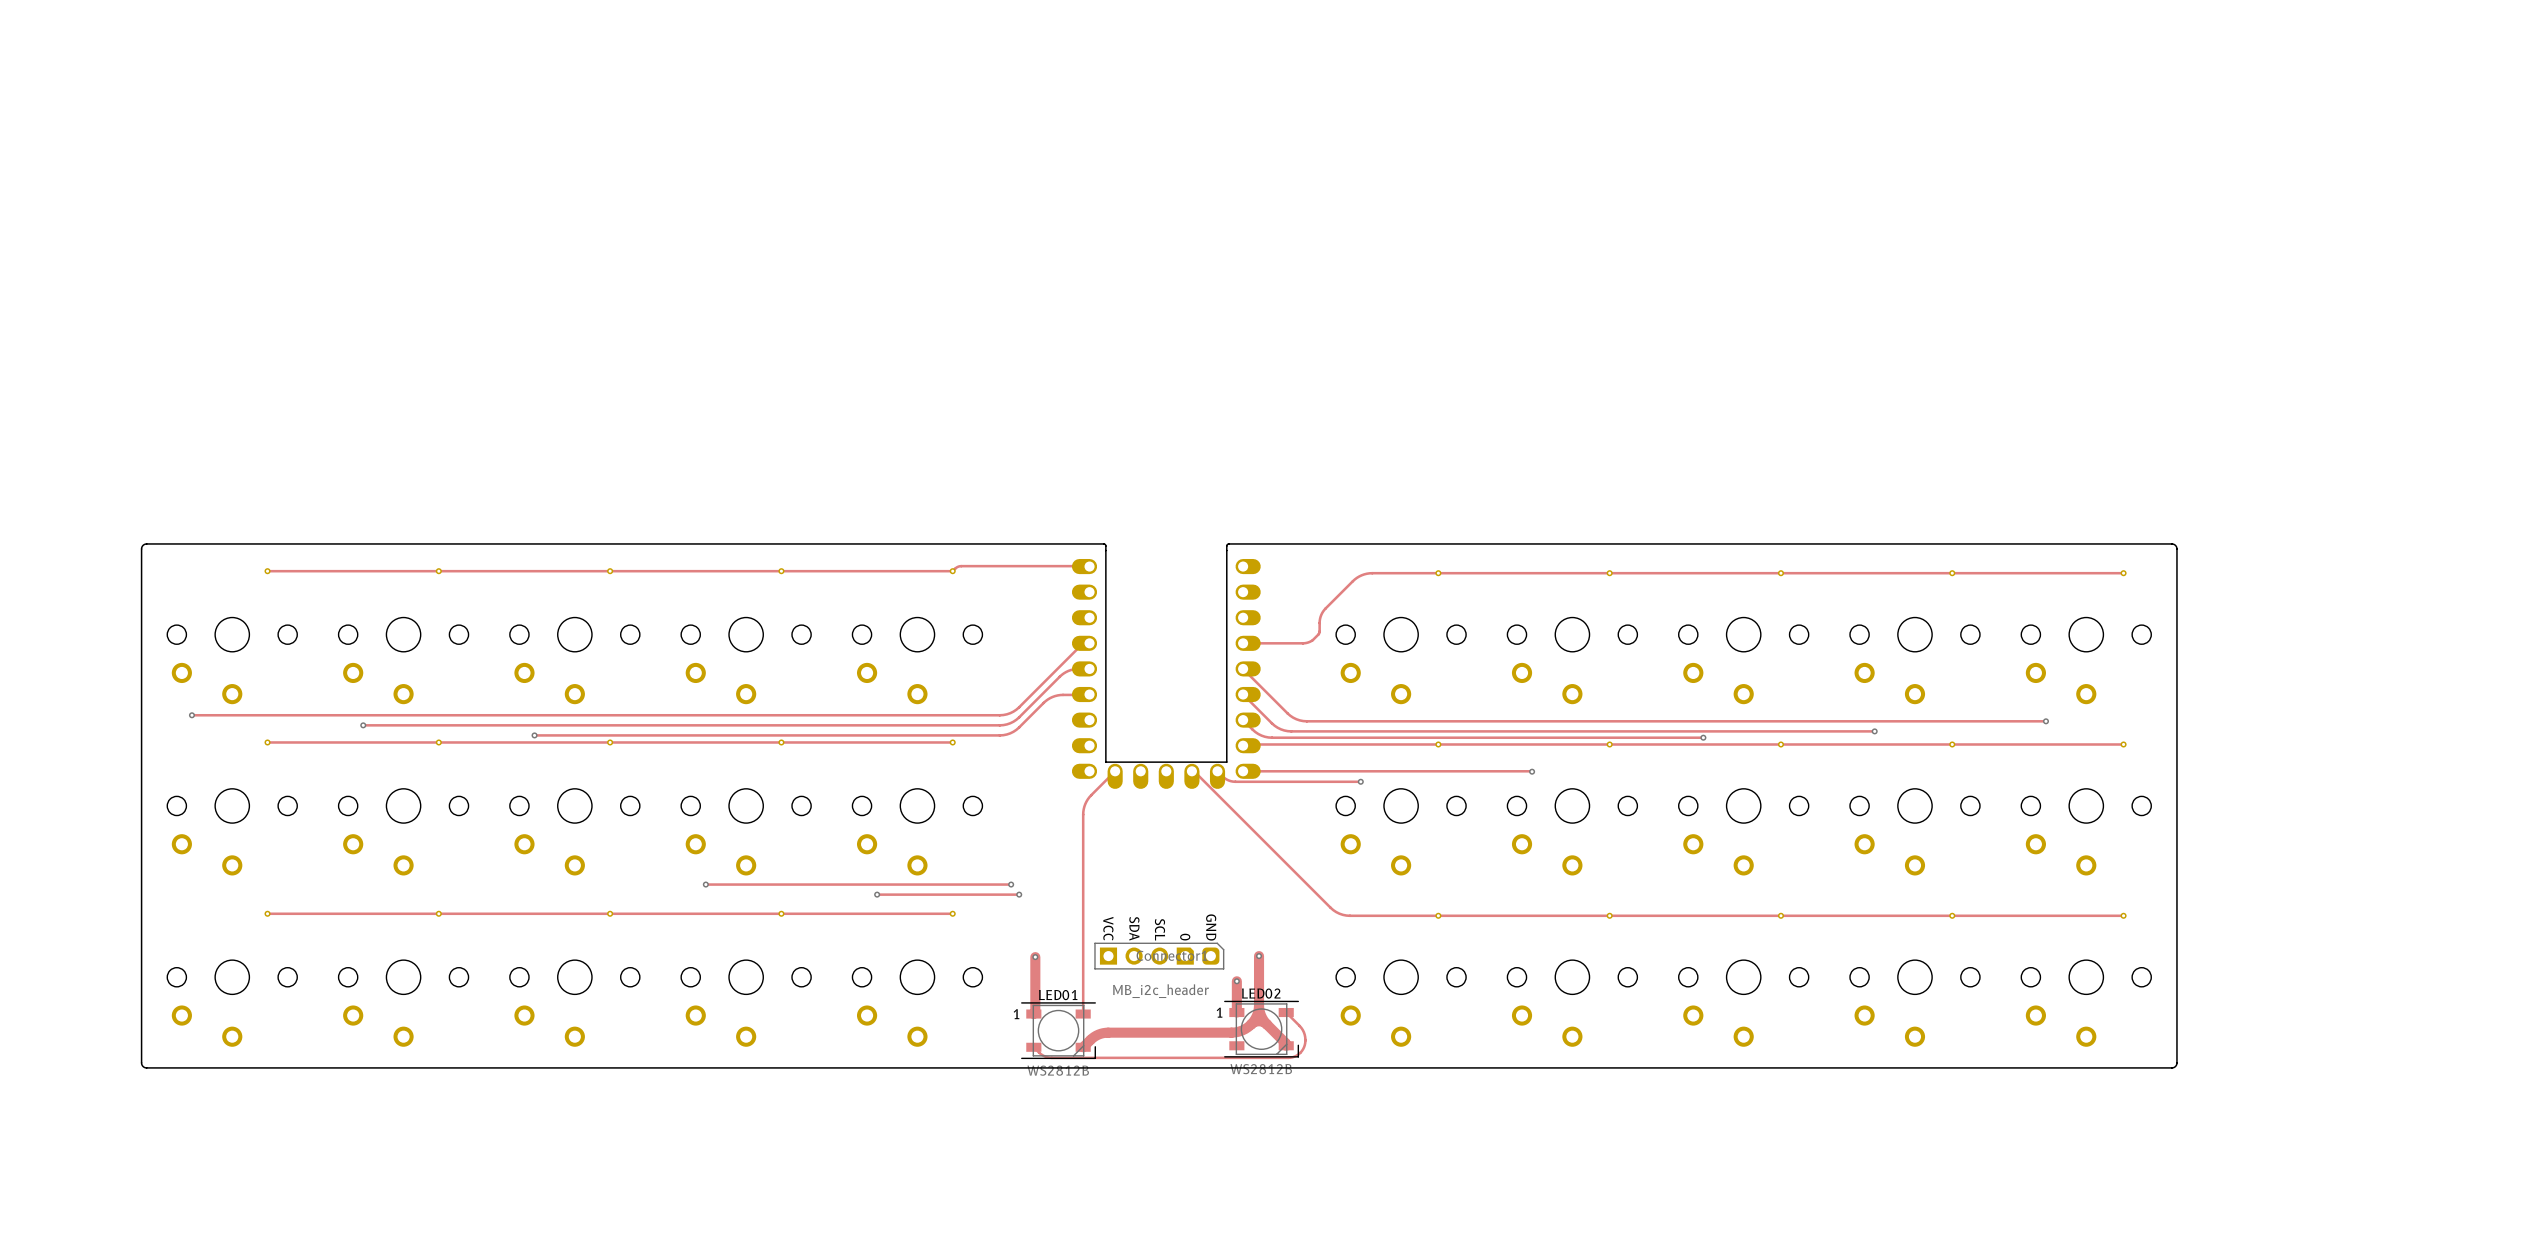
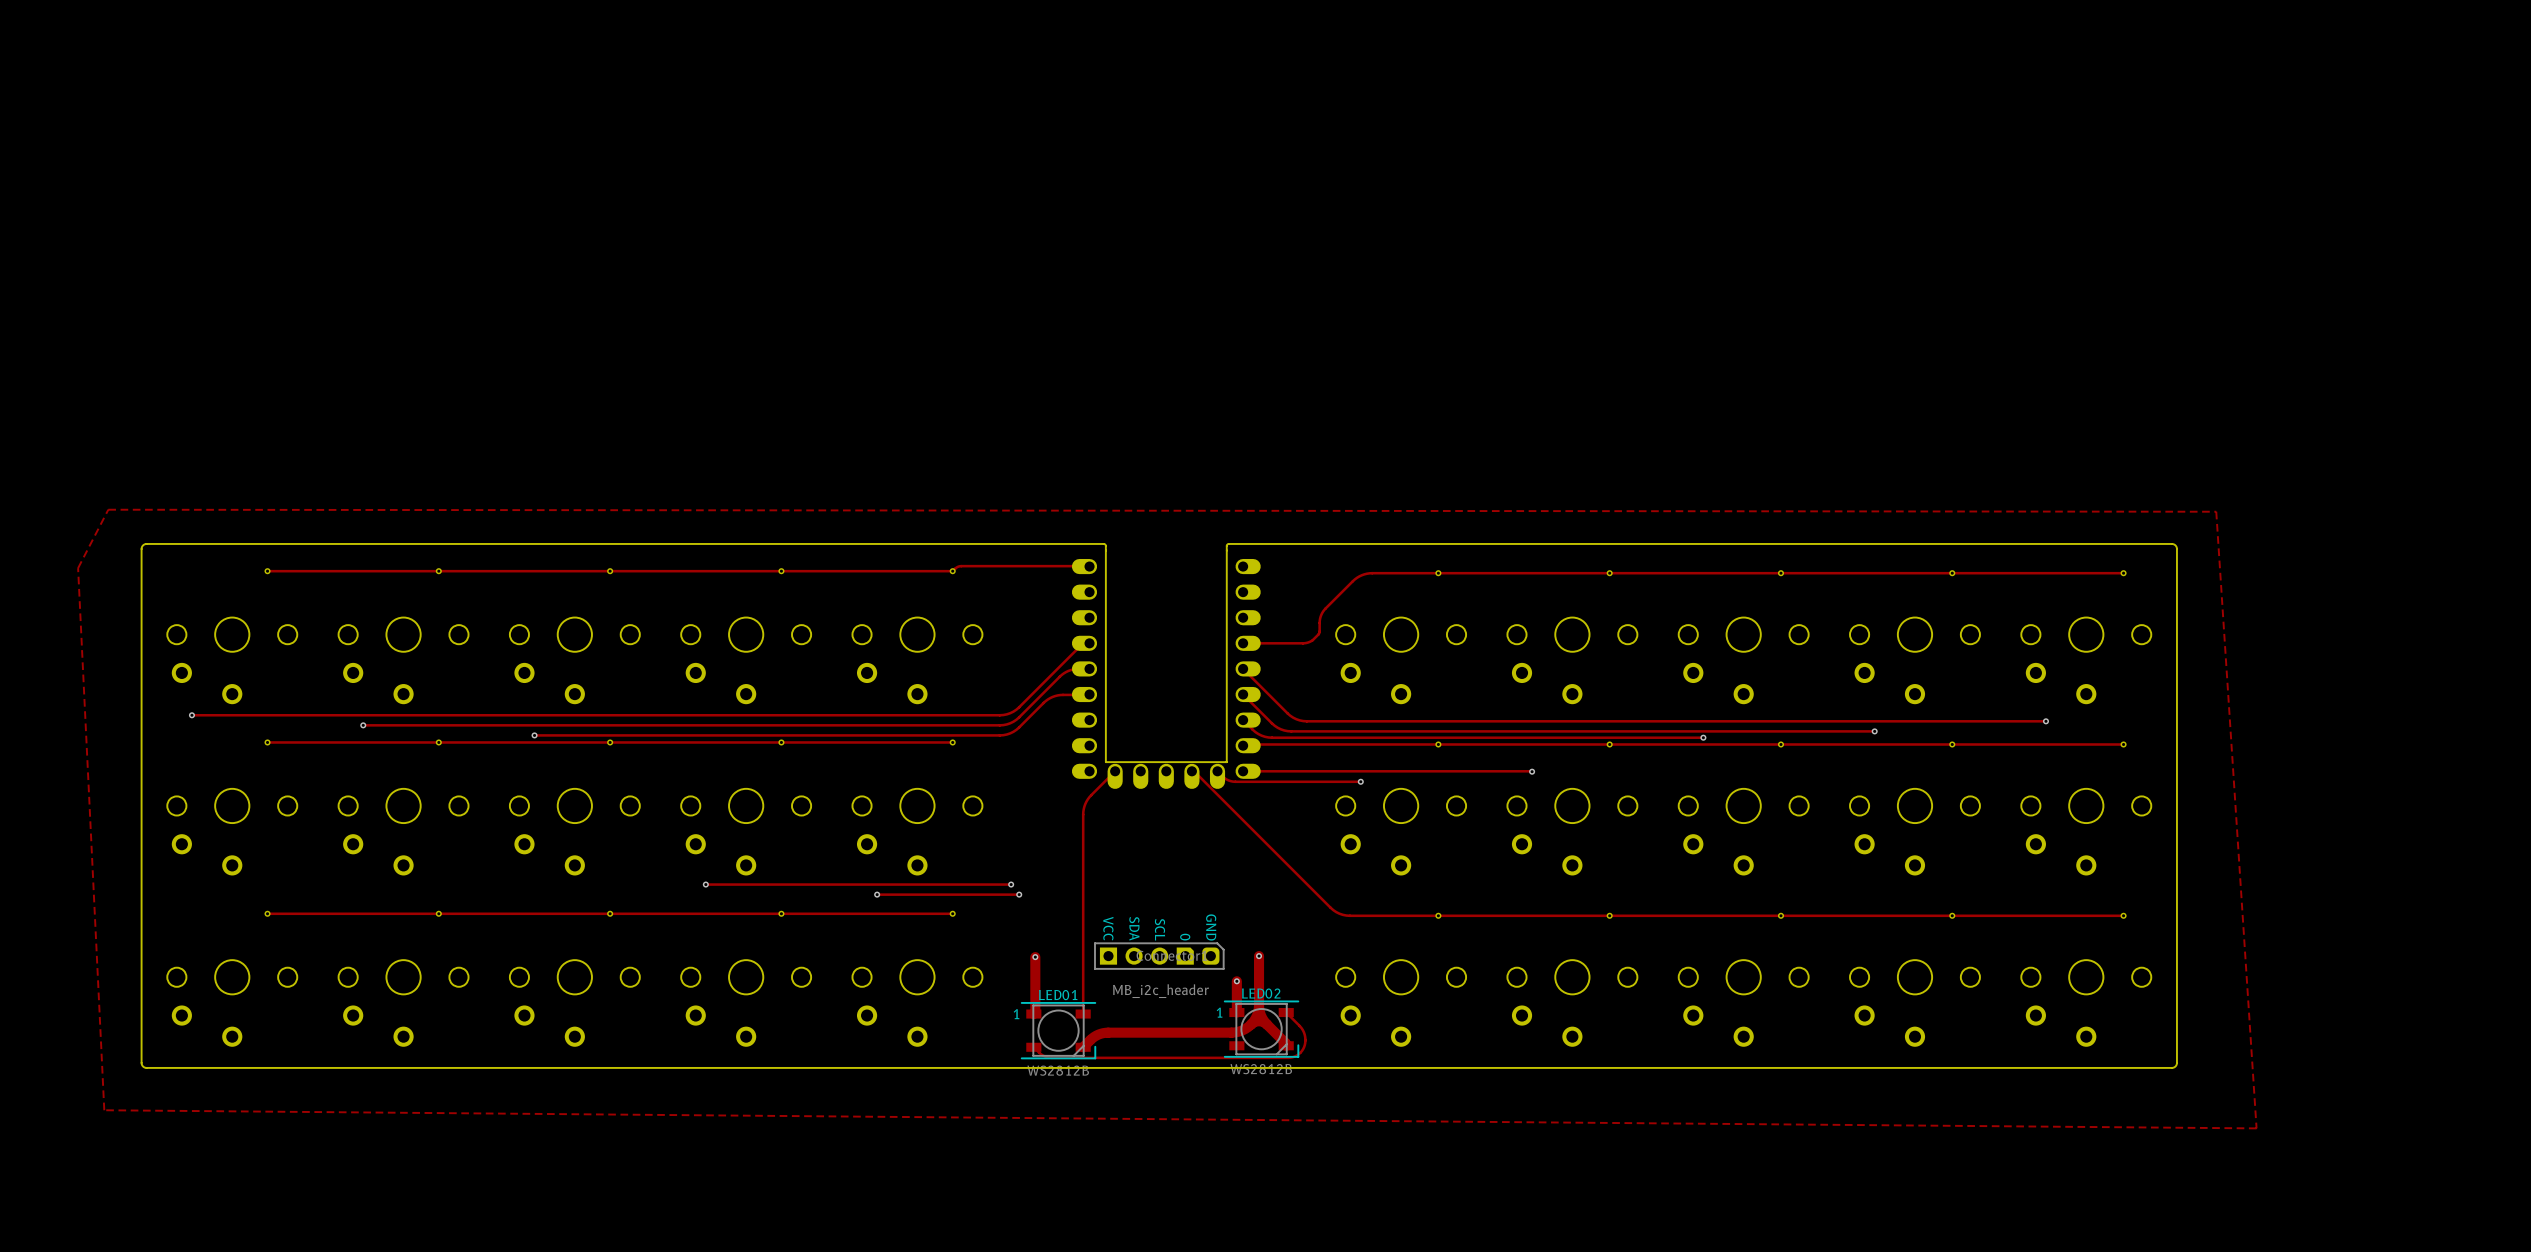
zone outline: none -> (108, 509) (2216, 511) (2256, 1128) (104, 1110) (78, 568) (108, 509)

